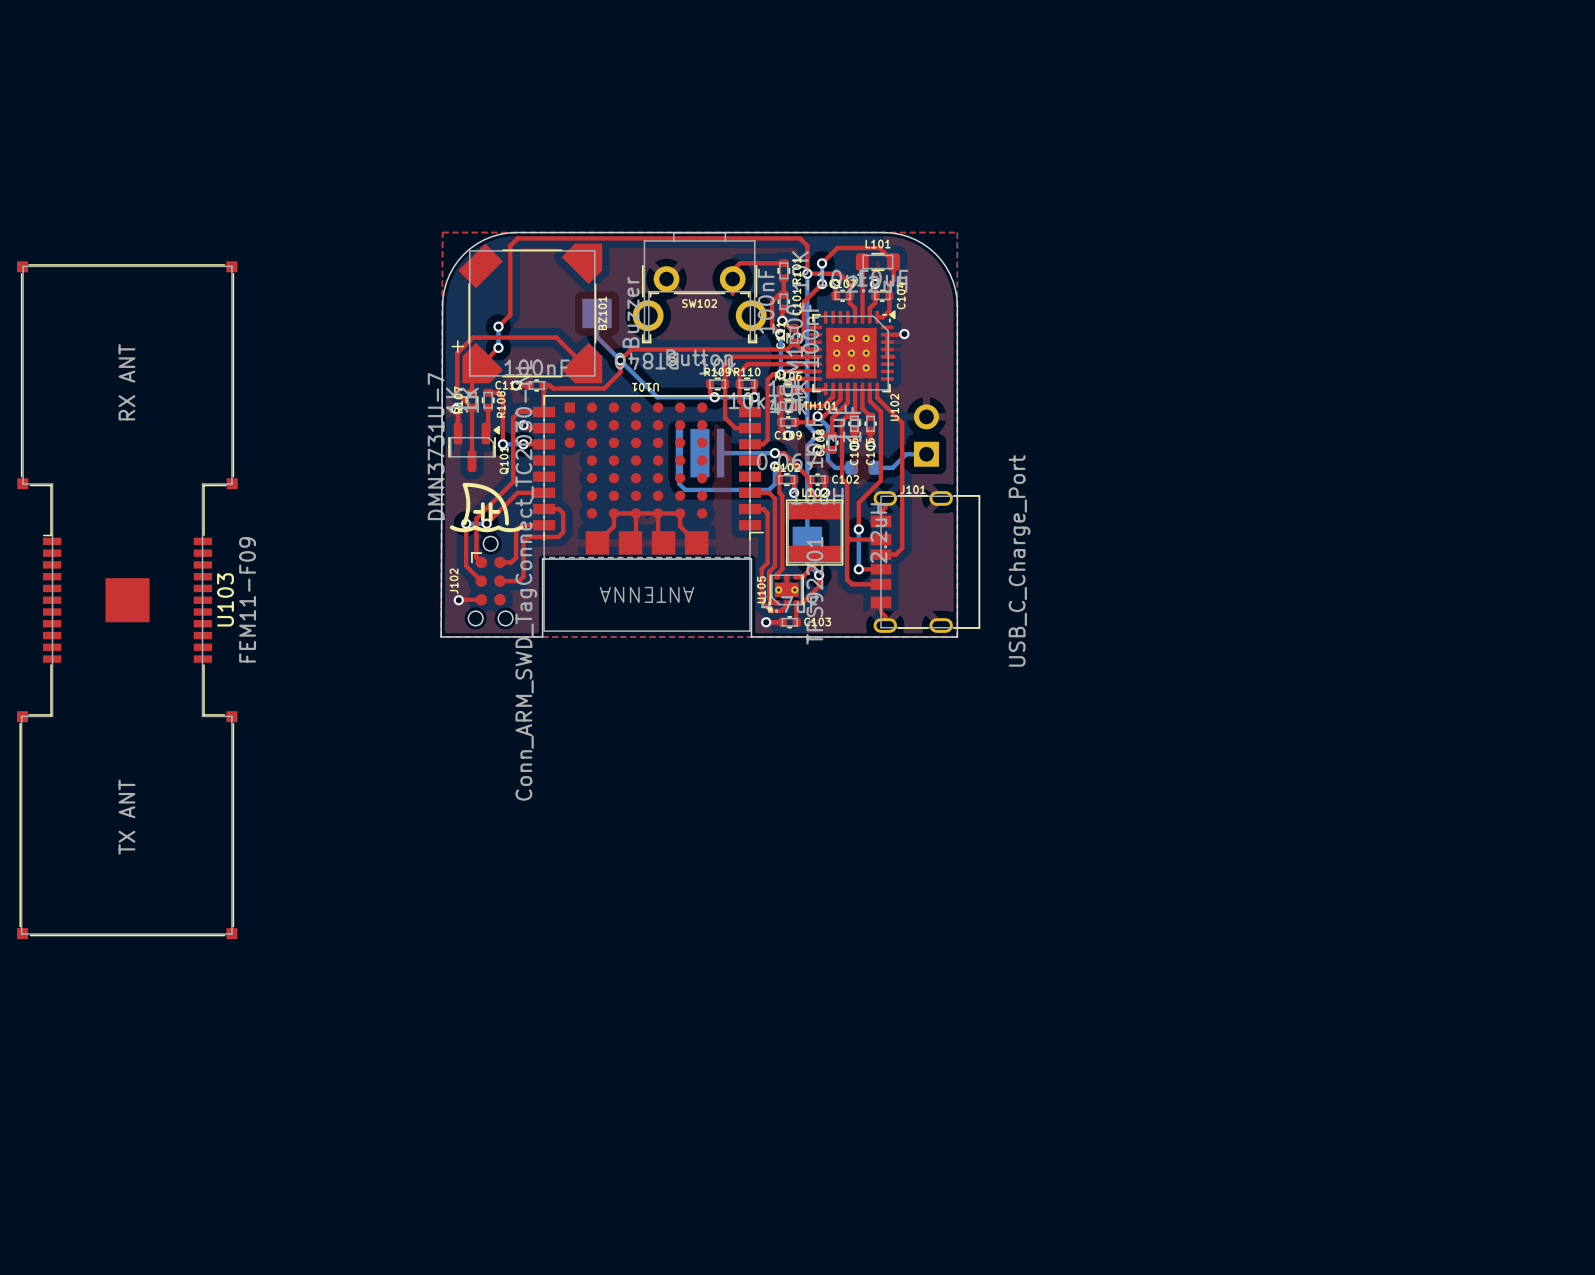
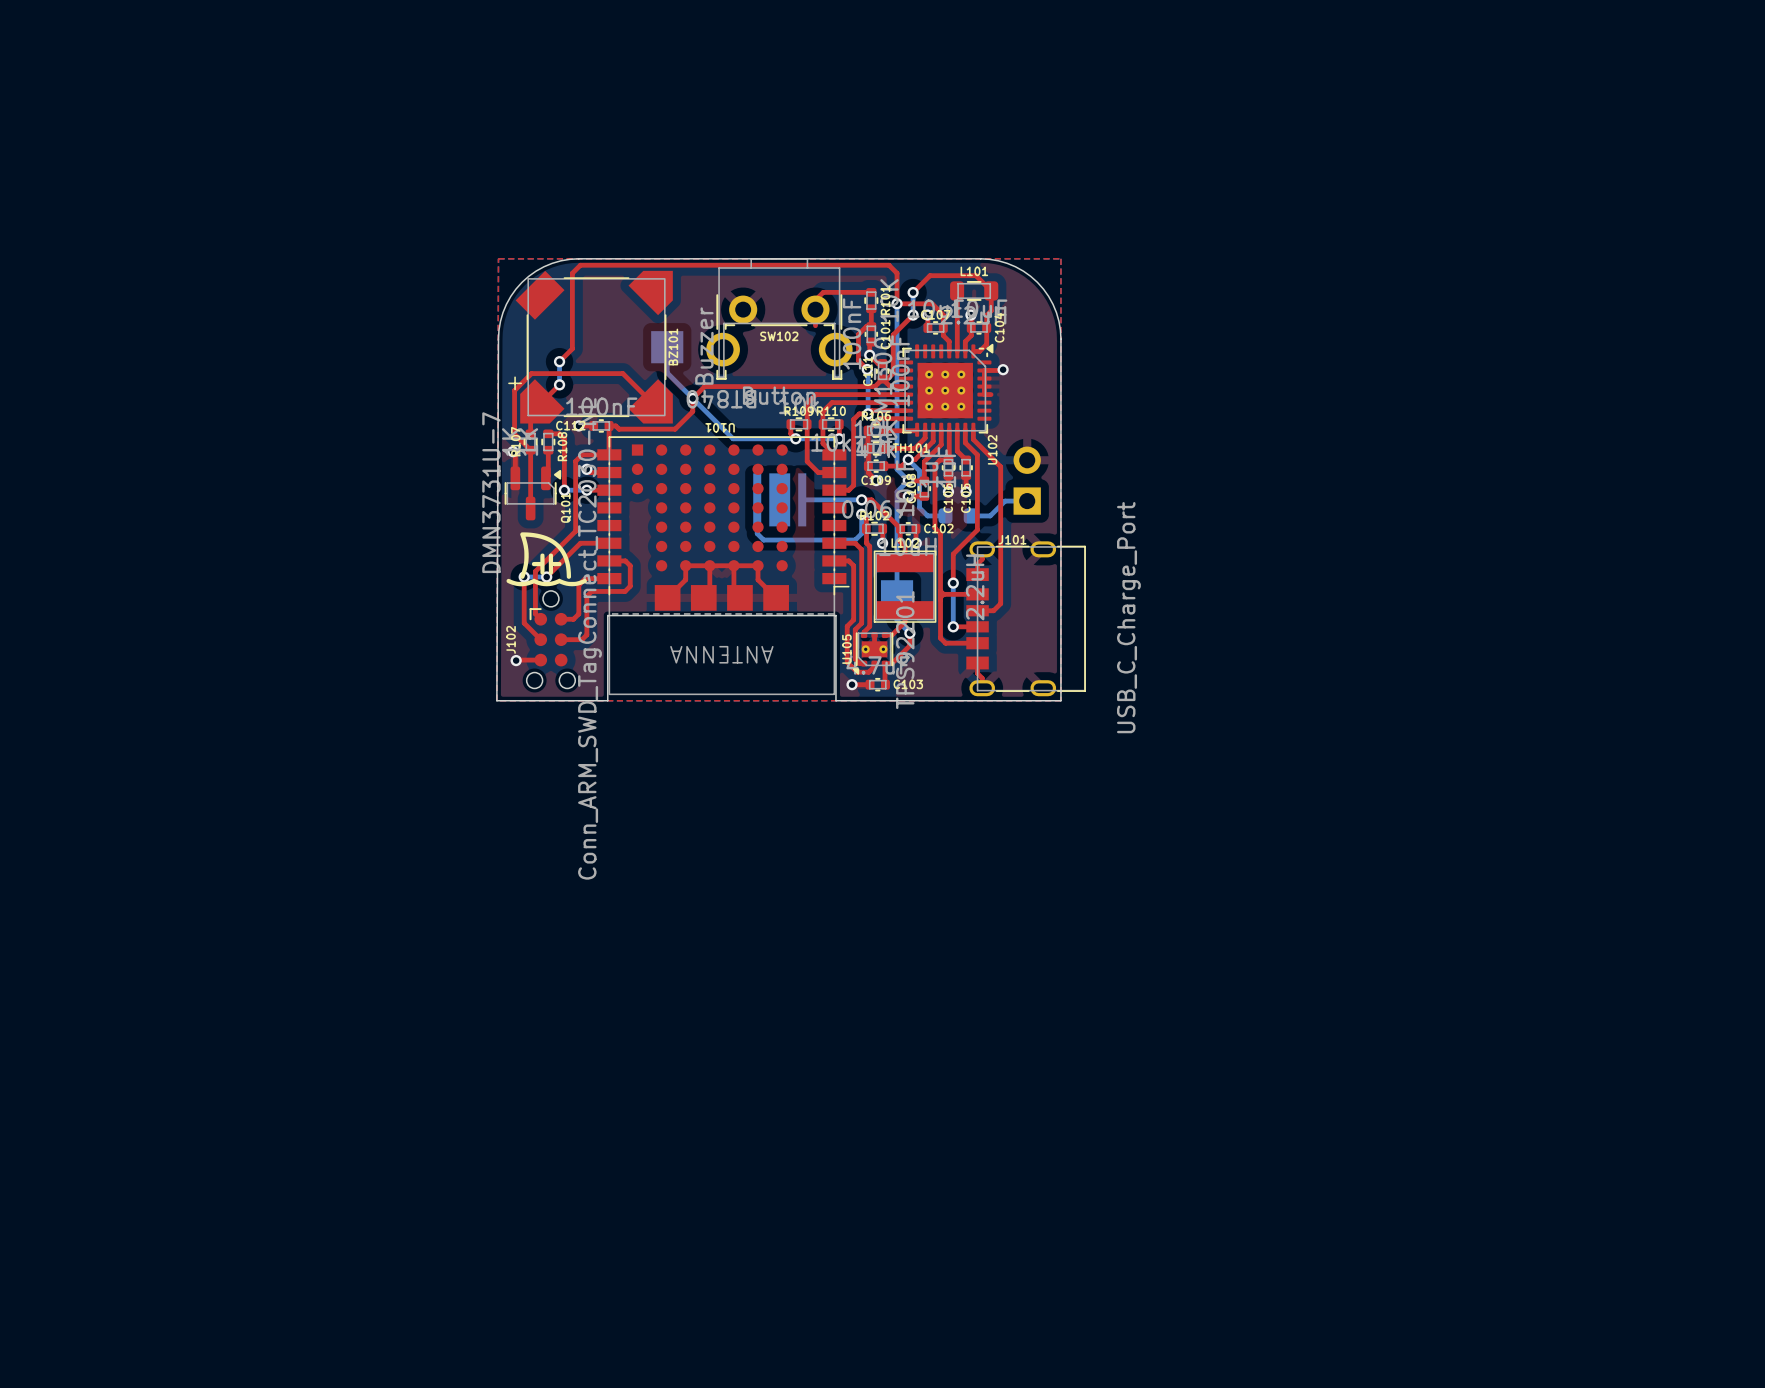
U103: FEM11-F09 (127, 600) -> none

